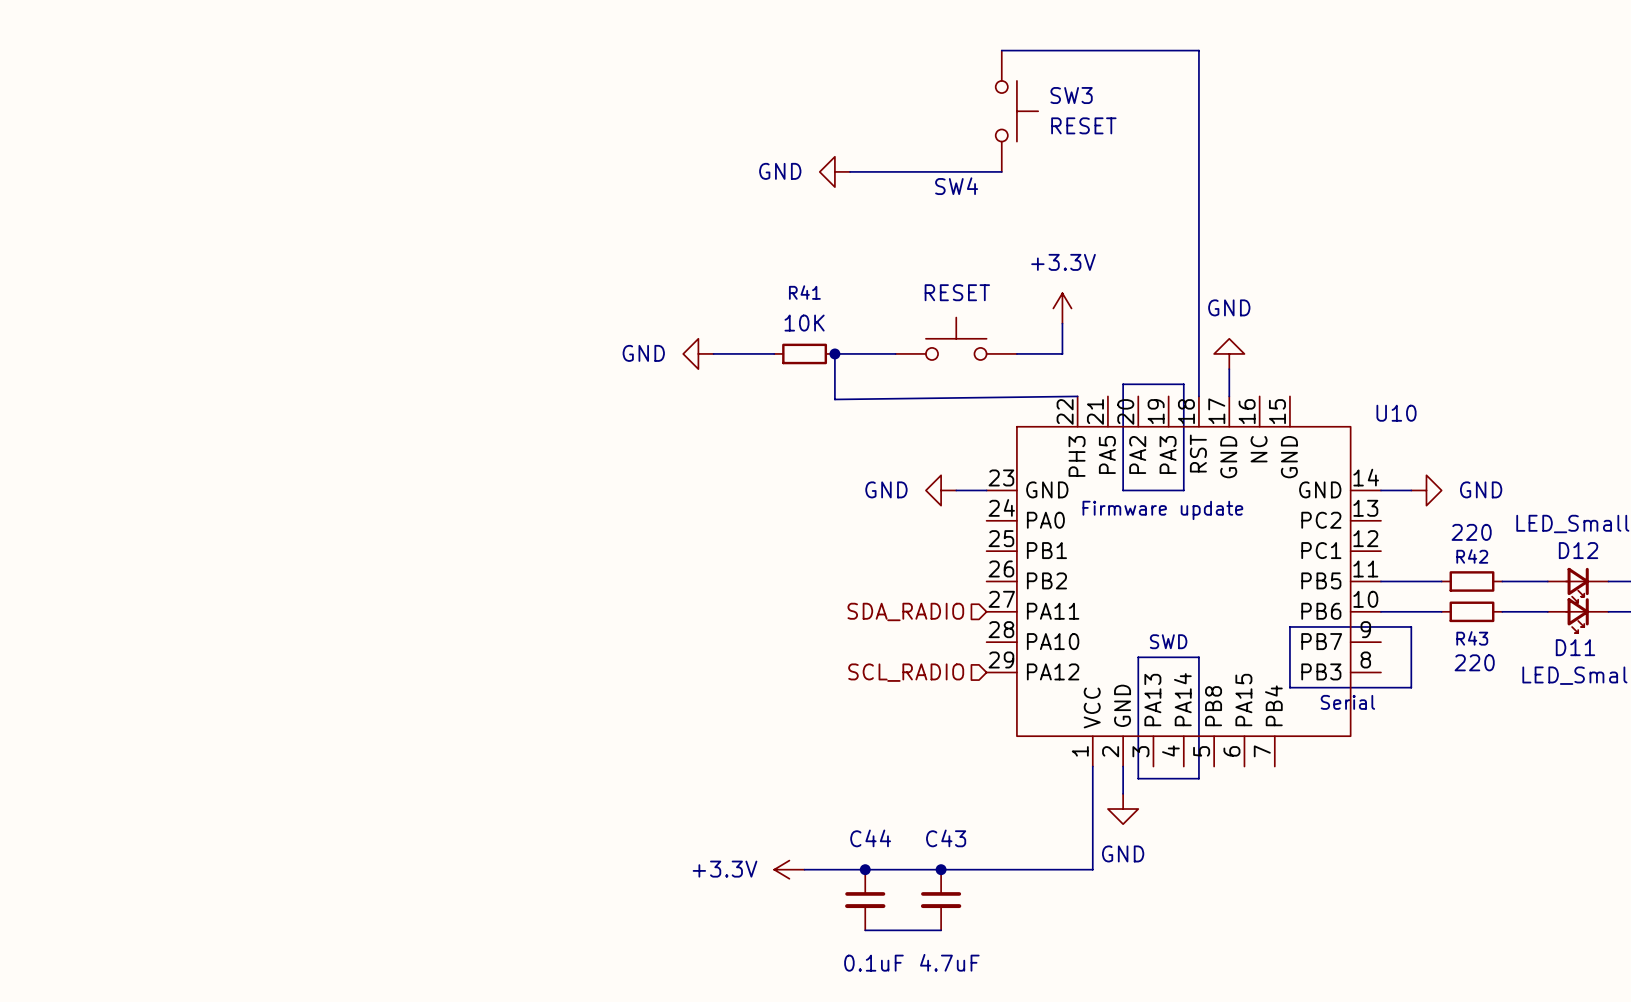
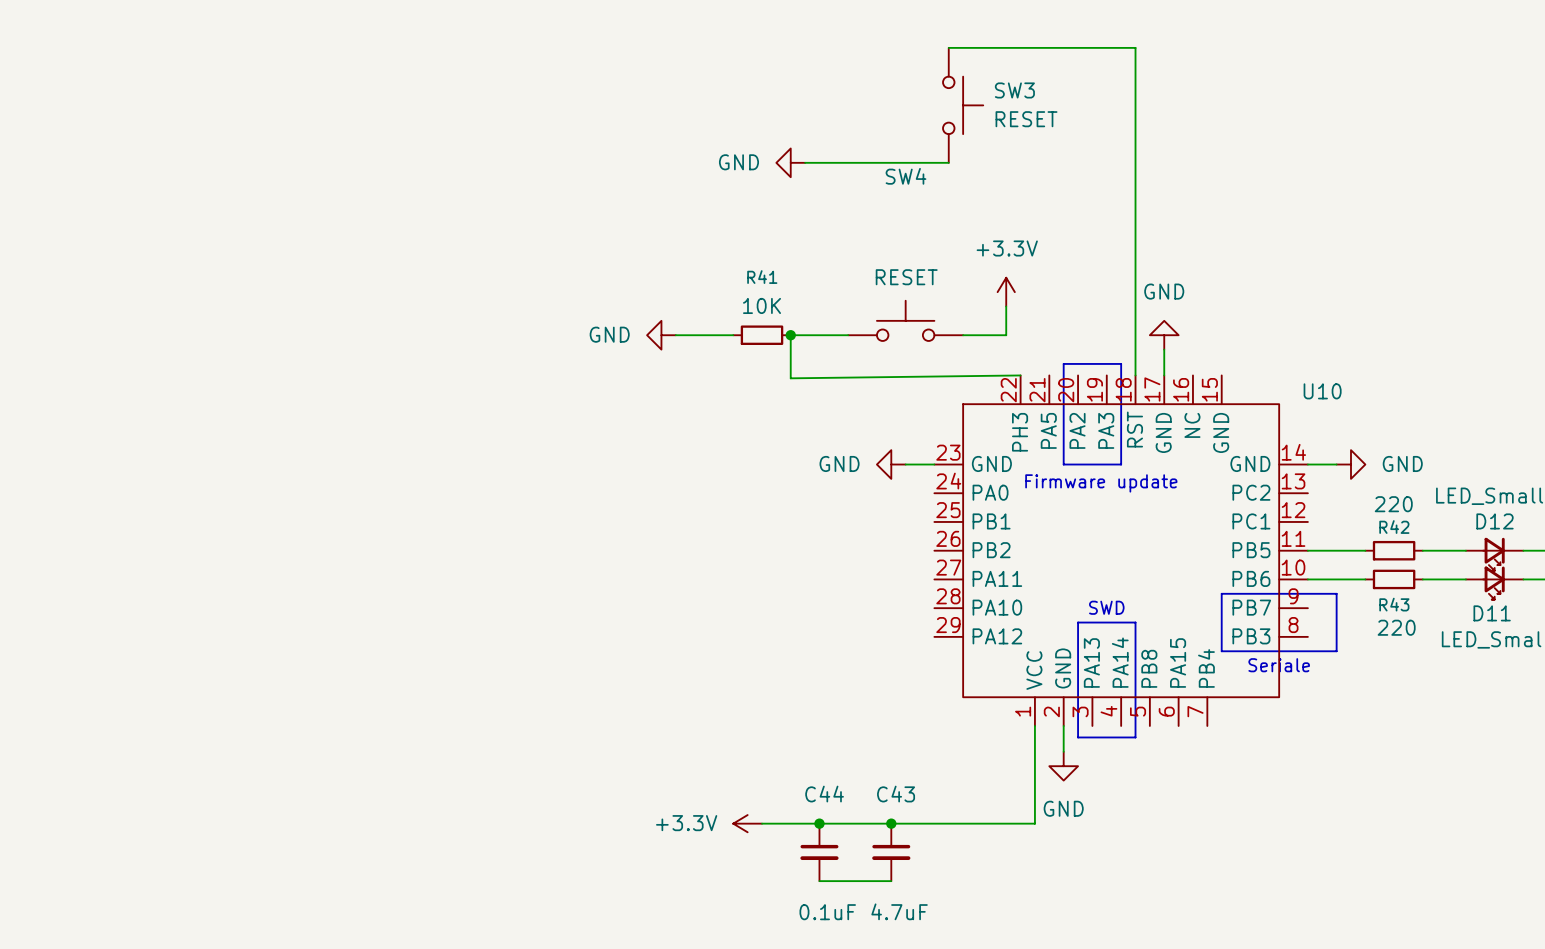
hierarchical label: SDA_RADIO (905, 611) -> none
hierarchical label: SCL_RADIO (906, 672) -> none
text: Serial (1347, 702) -> Seriale (1279, 665)

